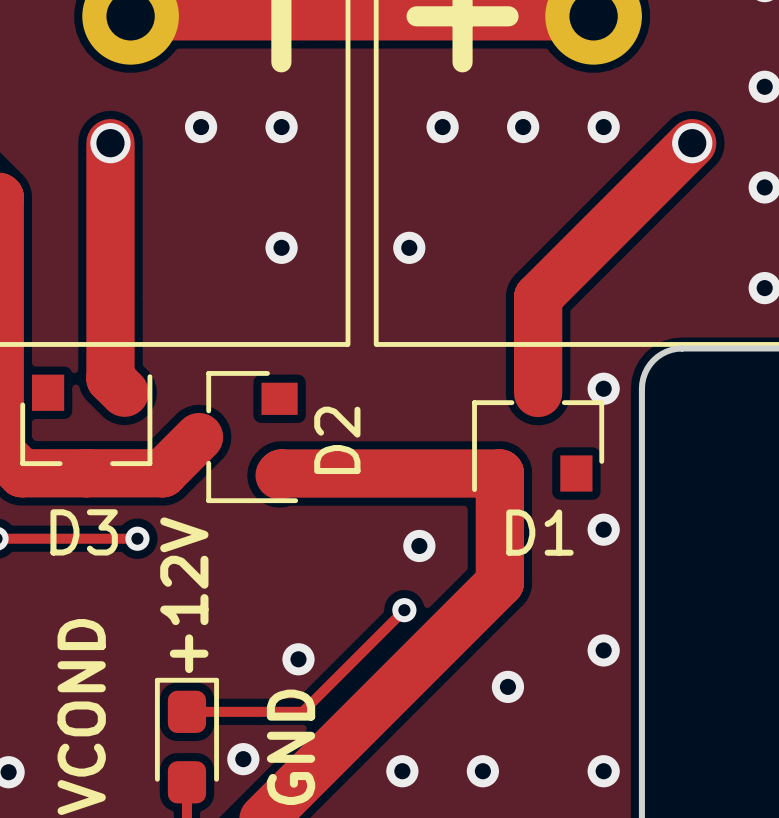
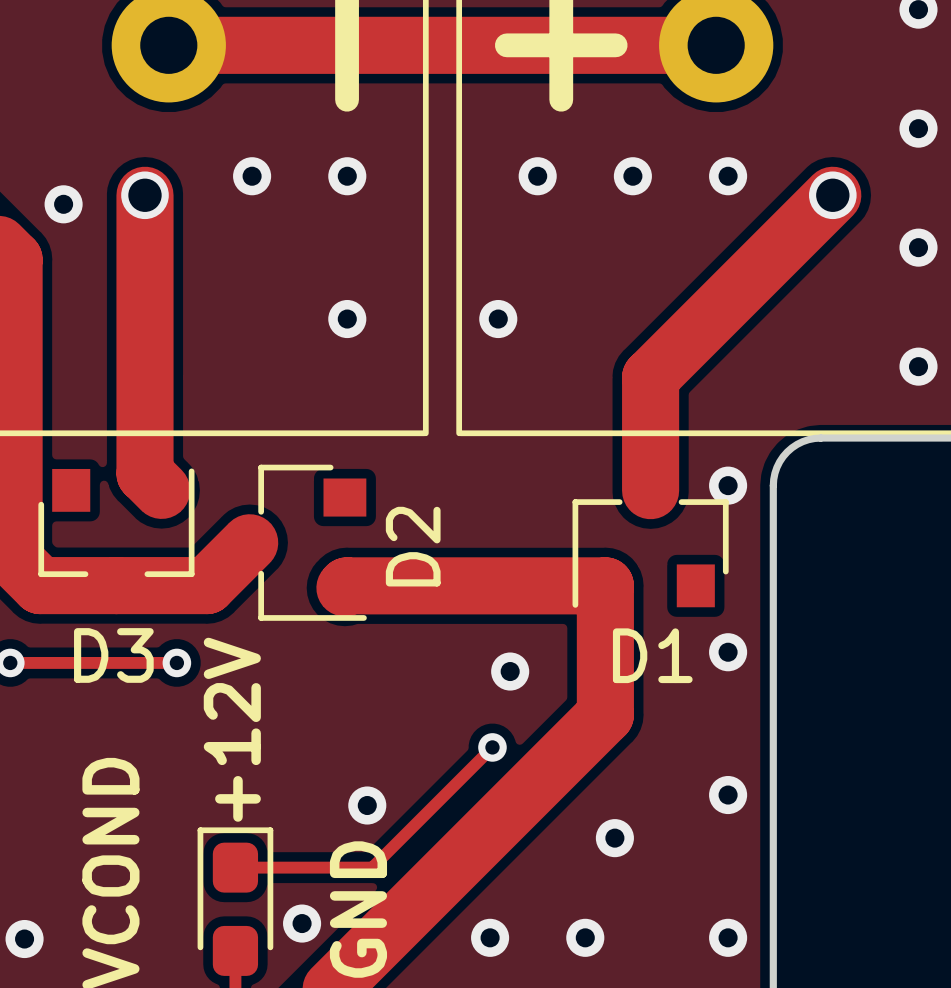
via: none -> (63, 204)

